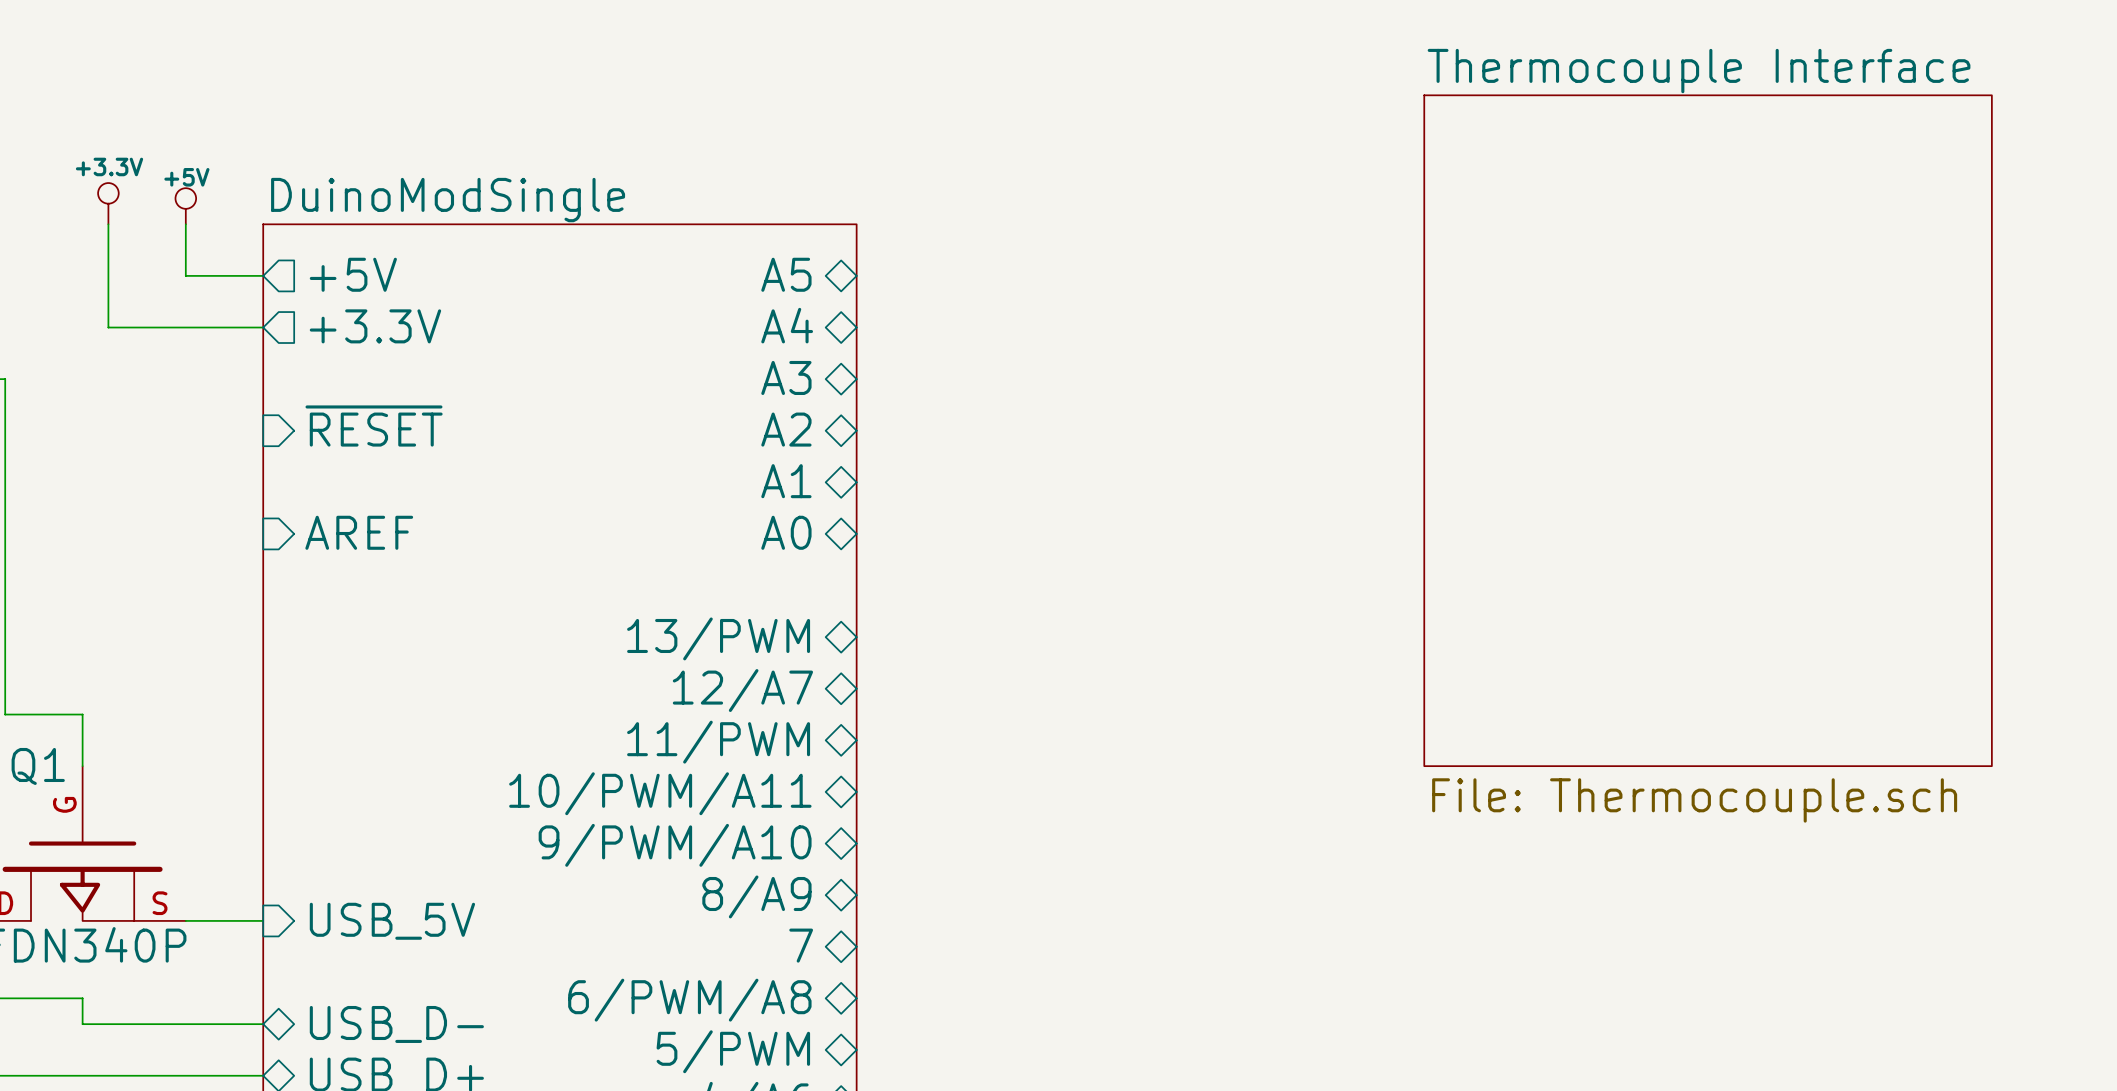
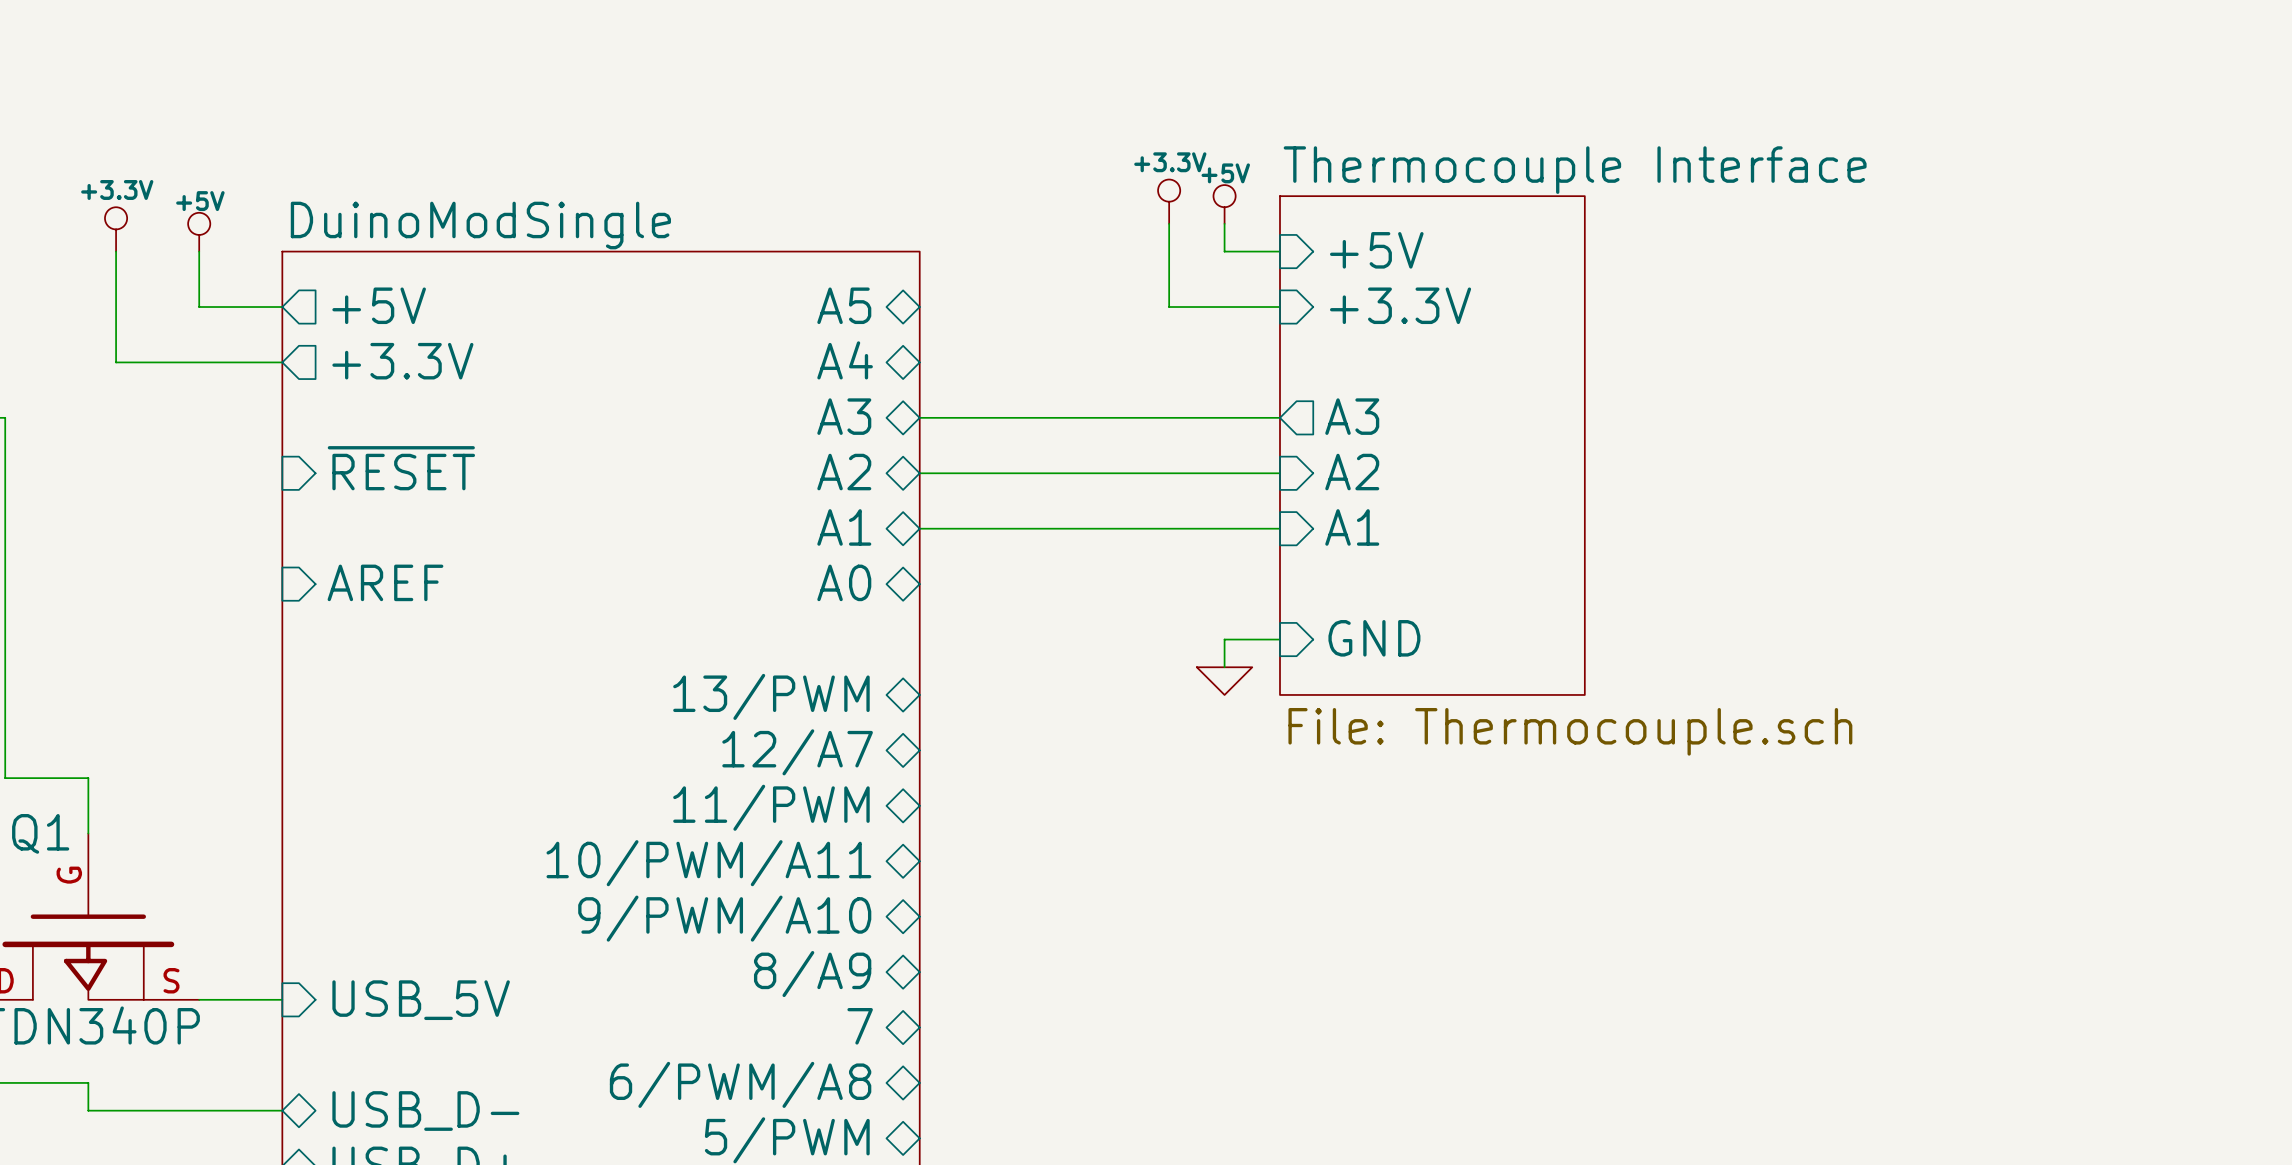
power symbol: none -> +3.3V (1169, 201)
power symbol: none -> +5V (1224, 204)
wire: none -> (1169, 223) (1169, 307) (1279, 307)
wire: none -> (1224, 223) (1224, 251) (1279, 251)
sheet pin: none -> +5V (1376, 250)
sheet pin: none -> +3.3V (1400, 305)
sheet pin: none -> A3 (1352, 416)
wire: none -> (919, 417) (1279, 417)
sheet Thermocouple Interface: none -> File: Thermocouple.sch (1432, 445)
sheet pin: none -> A2 (1352, 472)
wire: none -> (919, 473) (1279, 473)
sheet Thermocouple Interface: File: Thermocouple.sch (1708, 430) -> none
sheet pin: none -> A1 (1352, 527)
wire: none -> (919, 528) (1279, 528)
sheet pin: none -> GND (1374, 638)
wire: none -> (1279, 639) (1224, 639) (1224, 667)
power symbol: none -> (1224, 681)

